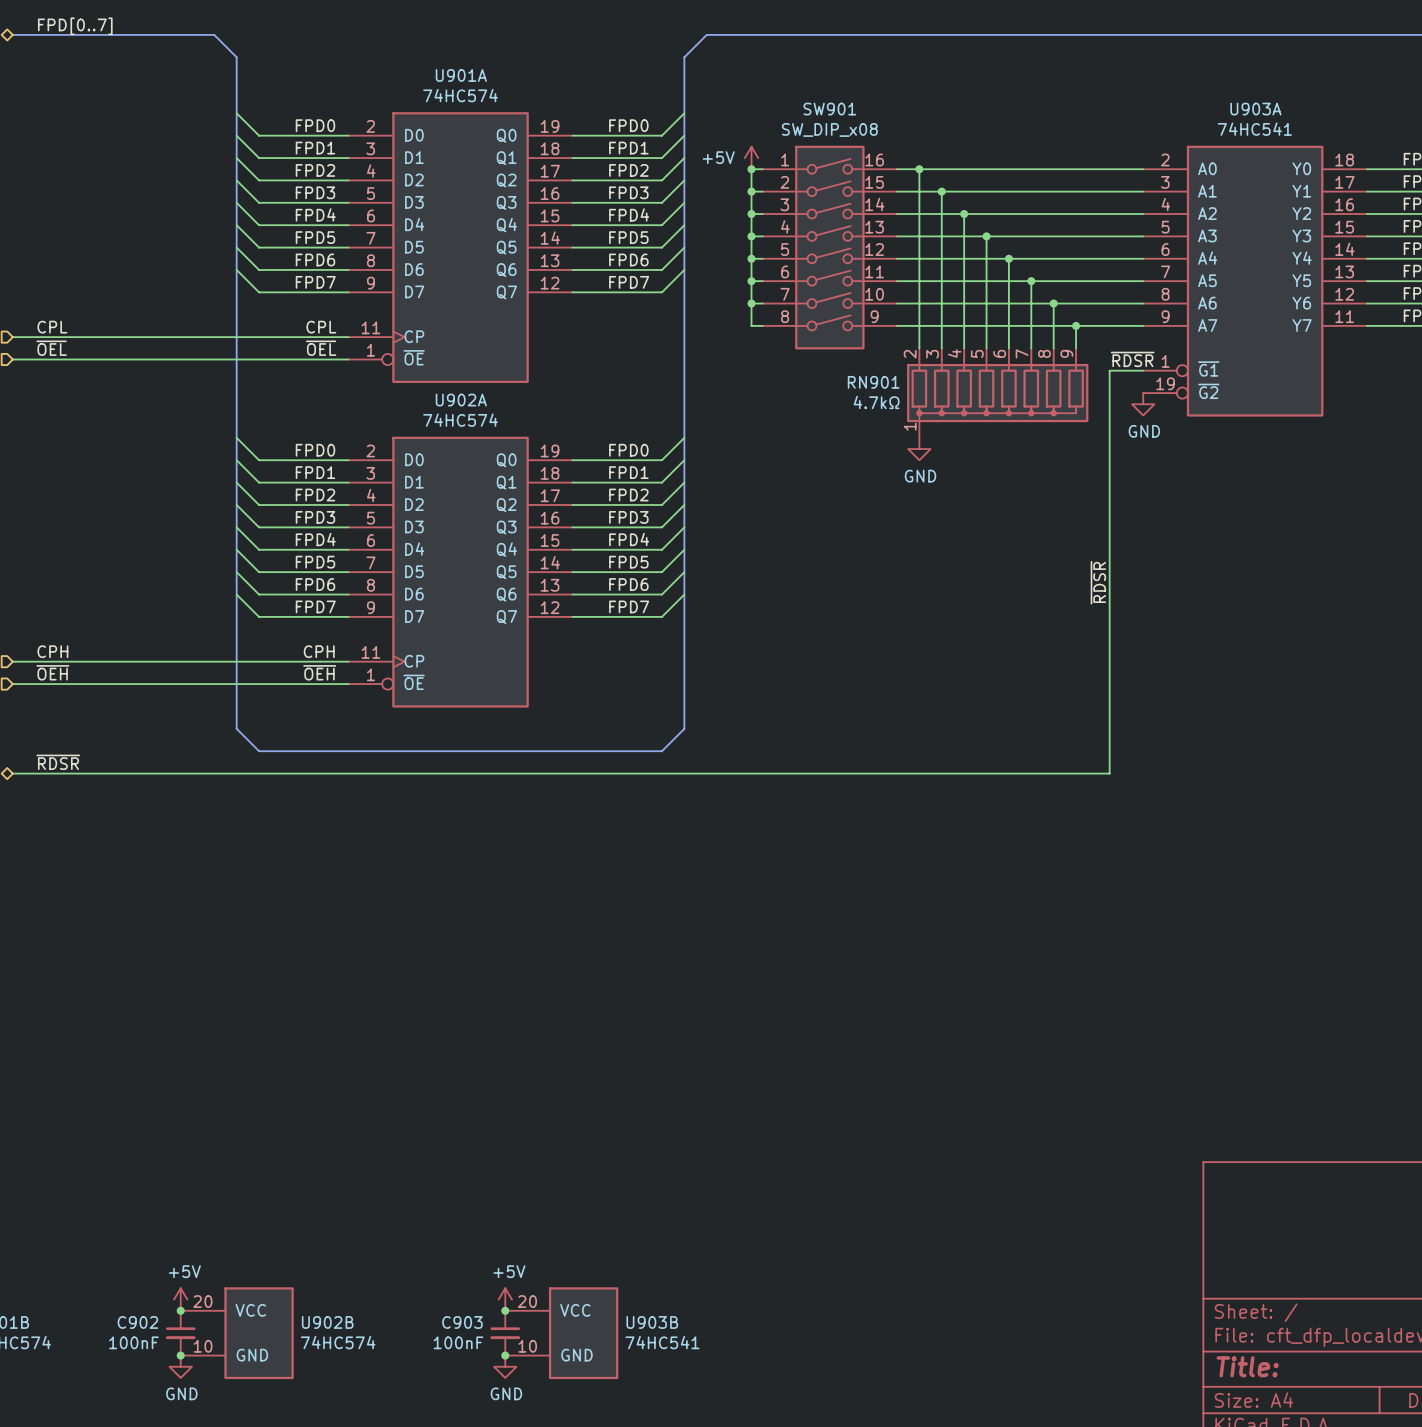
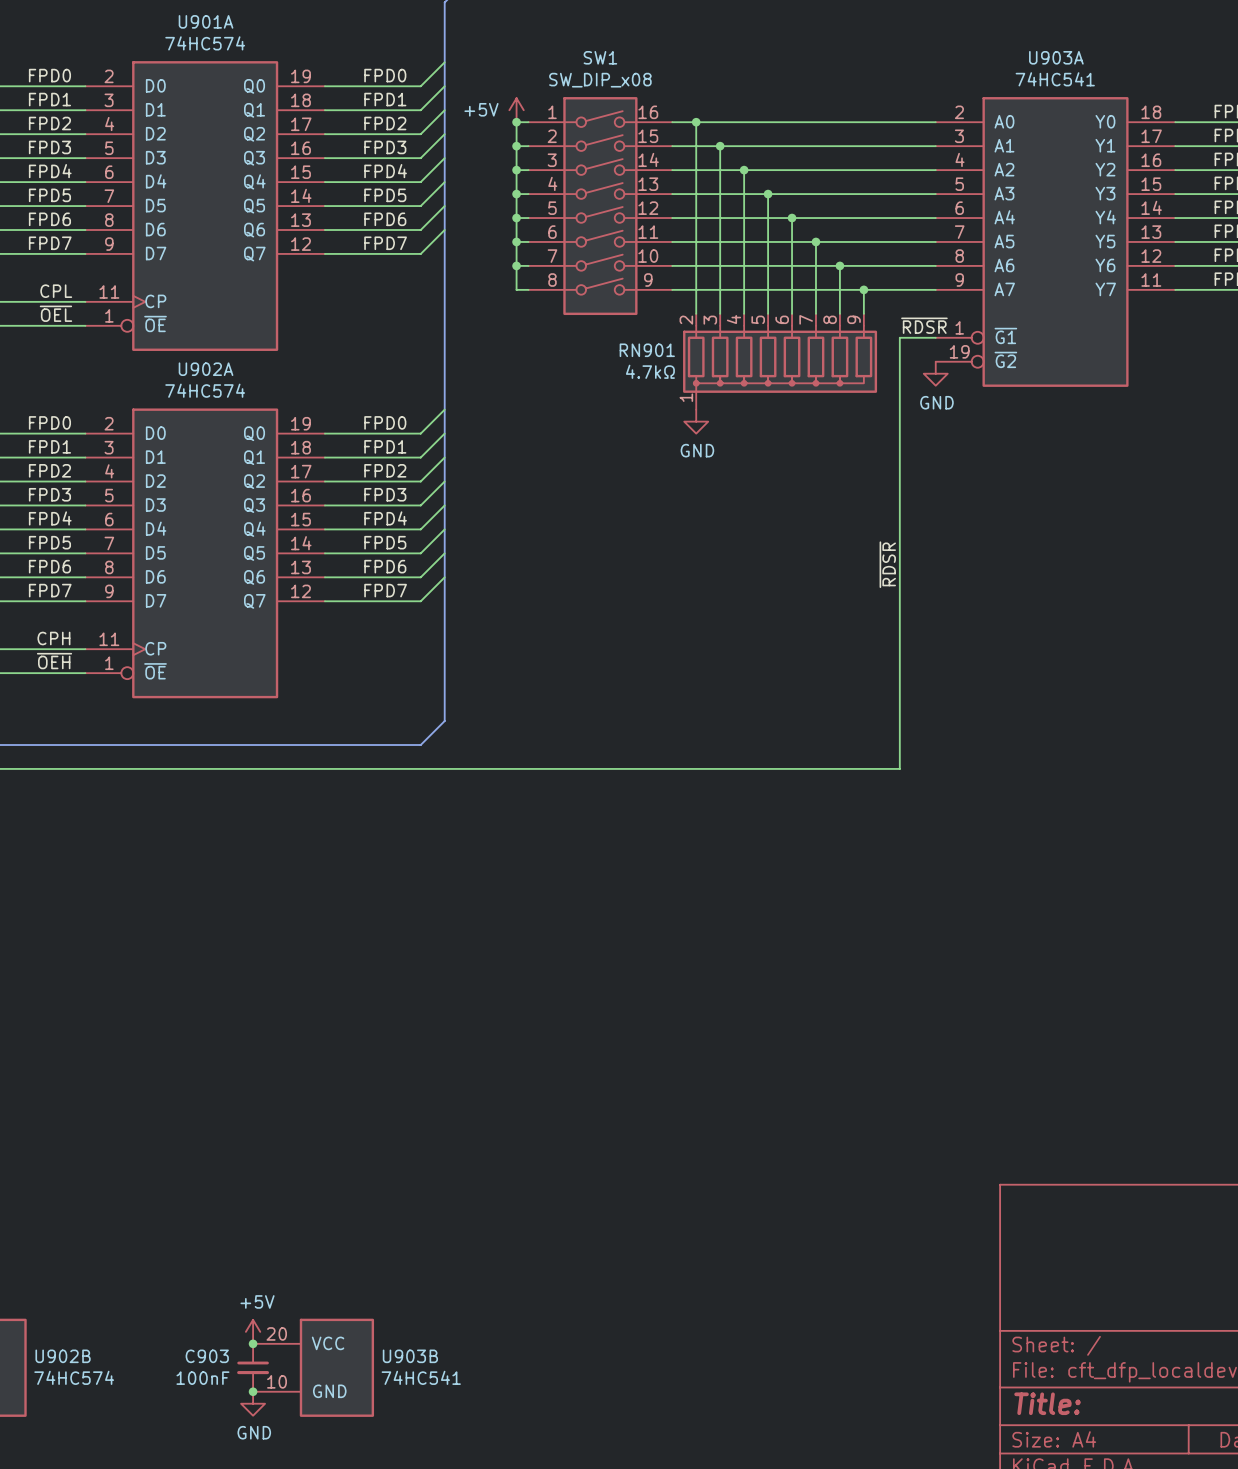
SW901 name: SW901 (829, 109) -> SW1 (600, 57)

